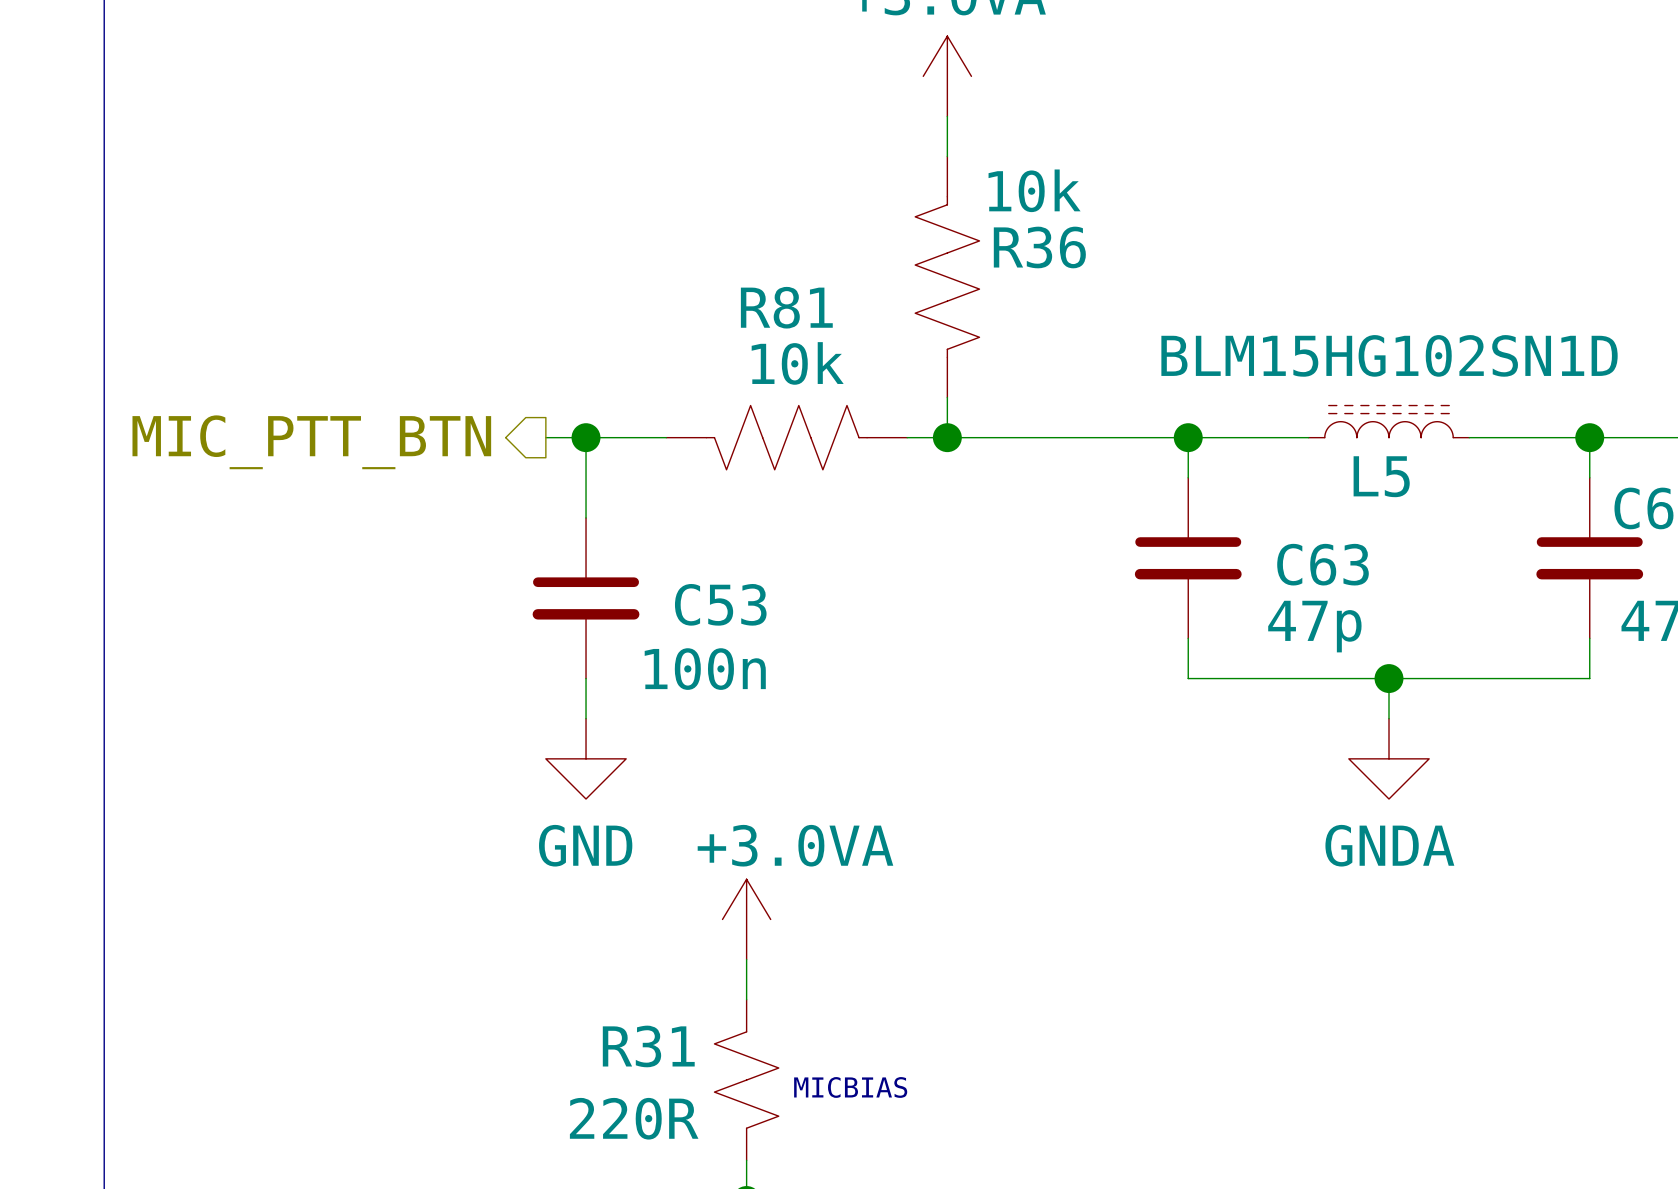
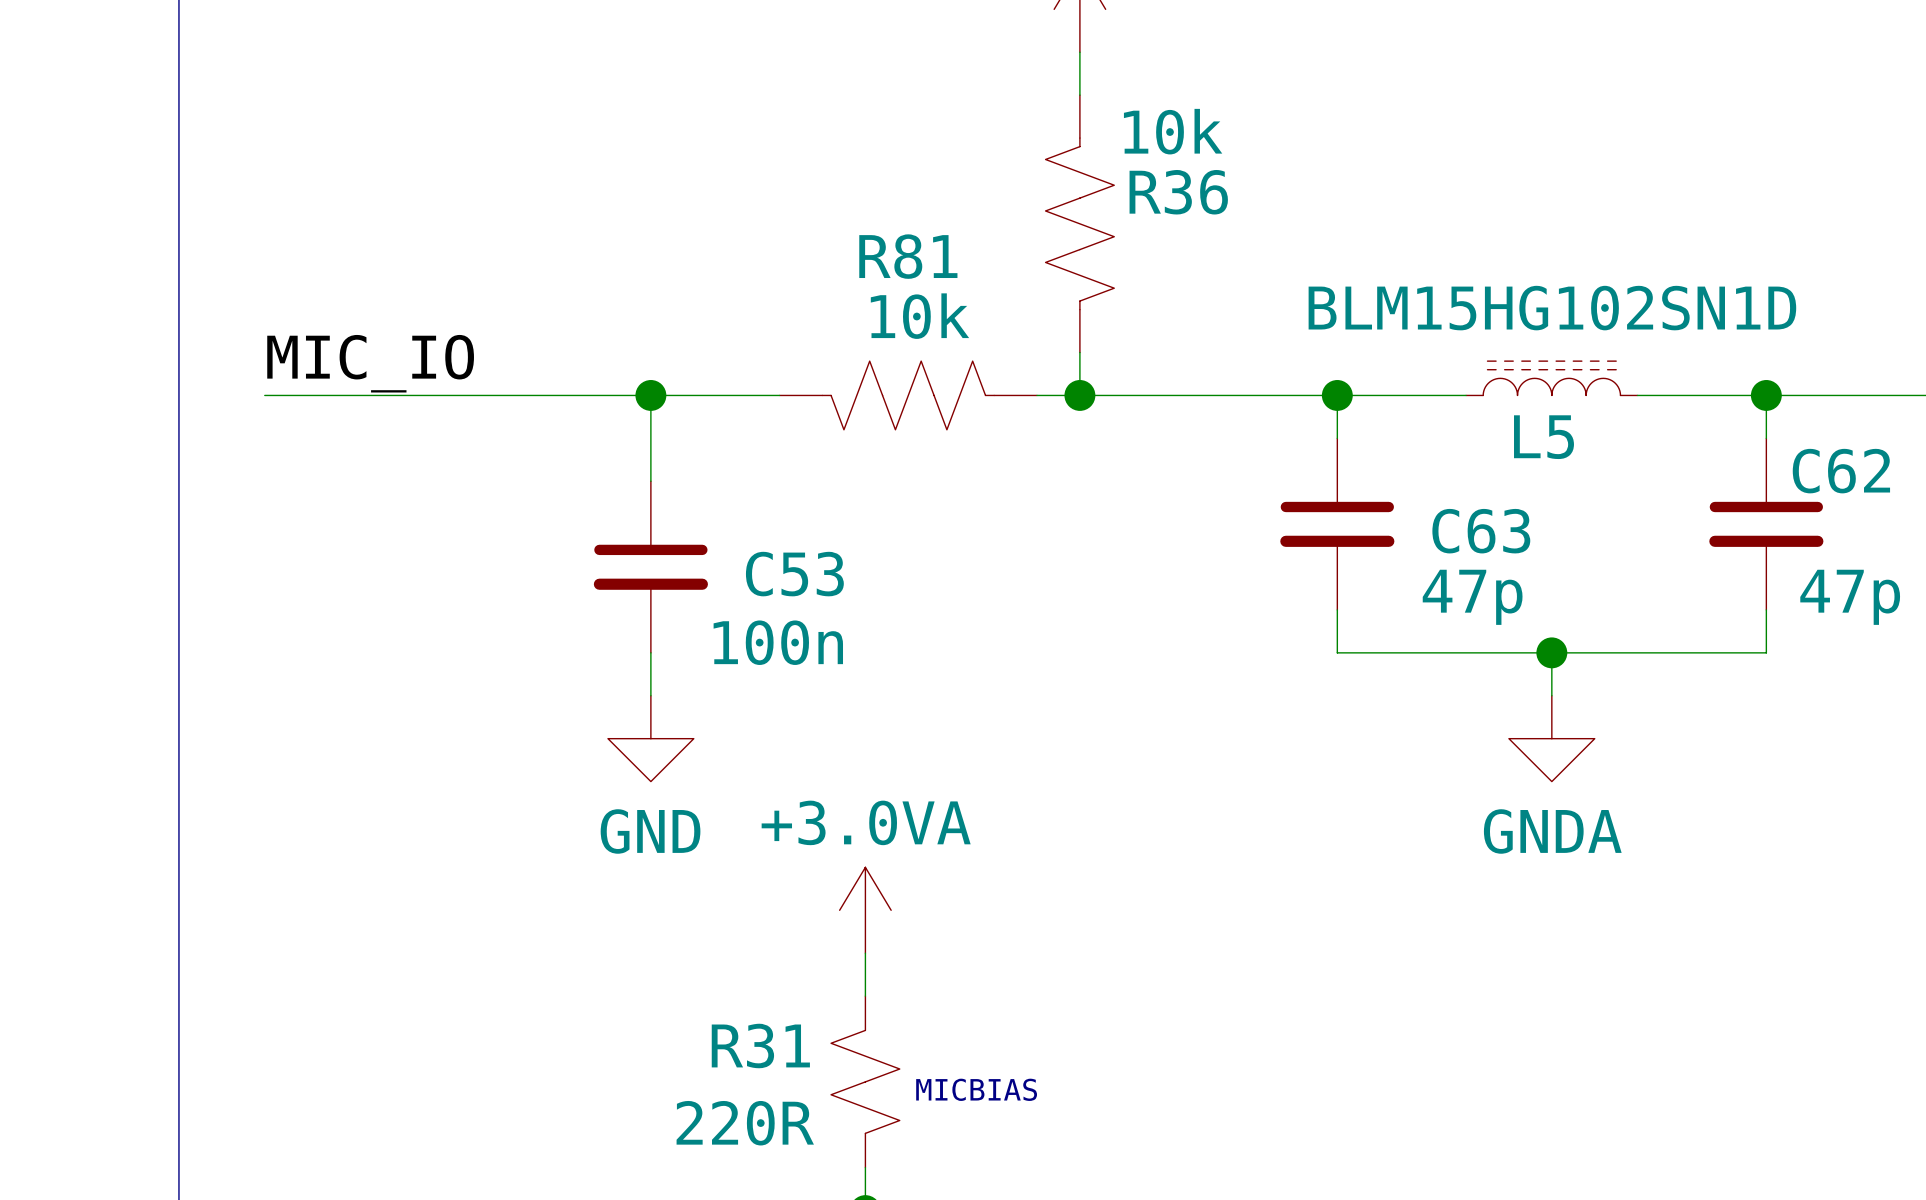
label: none -> MIC_IO (370, 363)
wire: none -> (264, 395) (650, 395) (650, 481)
wire: (586, 437) (586, 517) -> none
junction position: (586, 437) -> (650, 395)
hierarchical label: MIC_PTT_BTN (311, 442) -> none
C53 position: (586, 598) -> (650, 567)
wire: (586, 678) (586, 718) -> (650, 652) (650, 695)
power symbol position: GND (586, 758) -> GND (650, 738)
power symbol text position: +3.0VA (795, 845) -> +3.0VA (866, 822)

